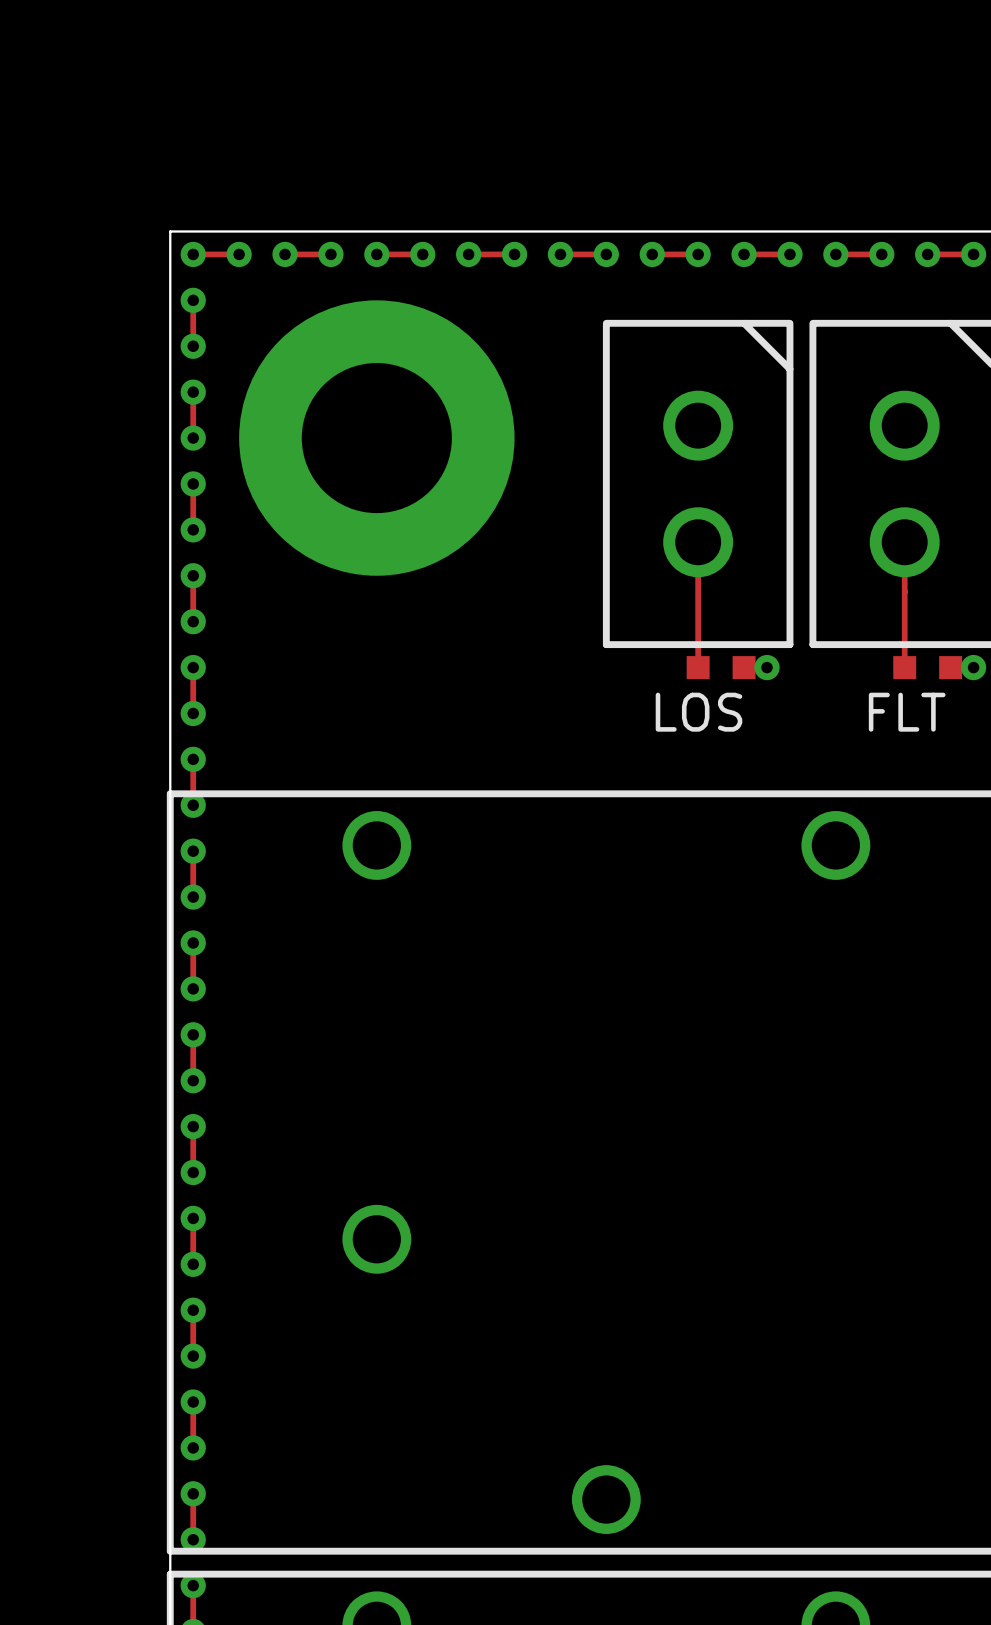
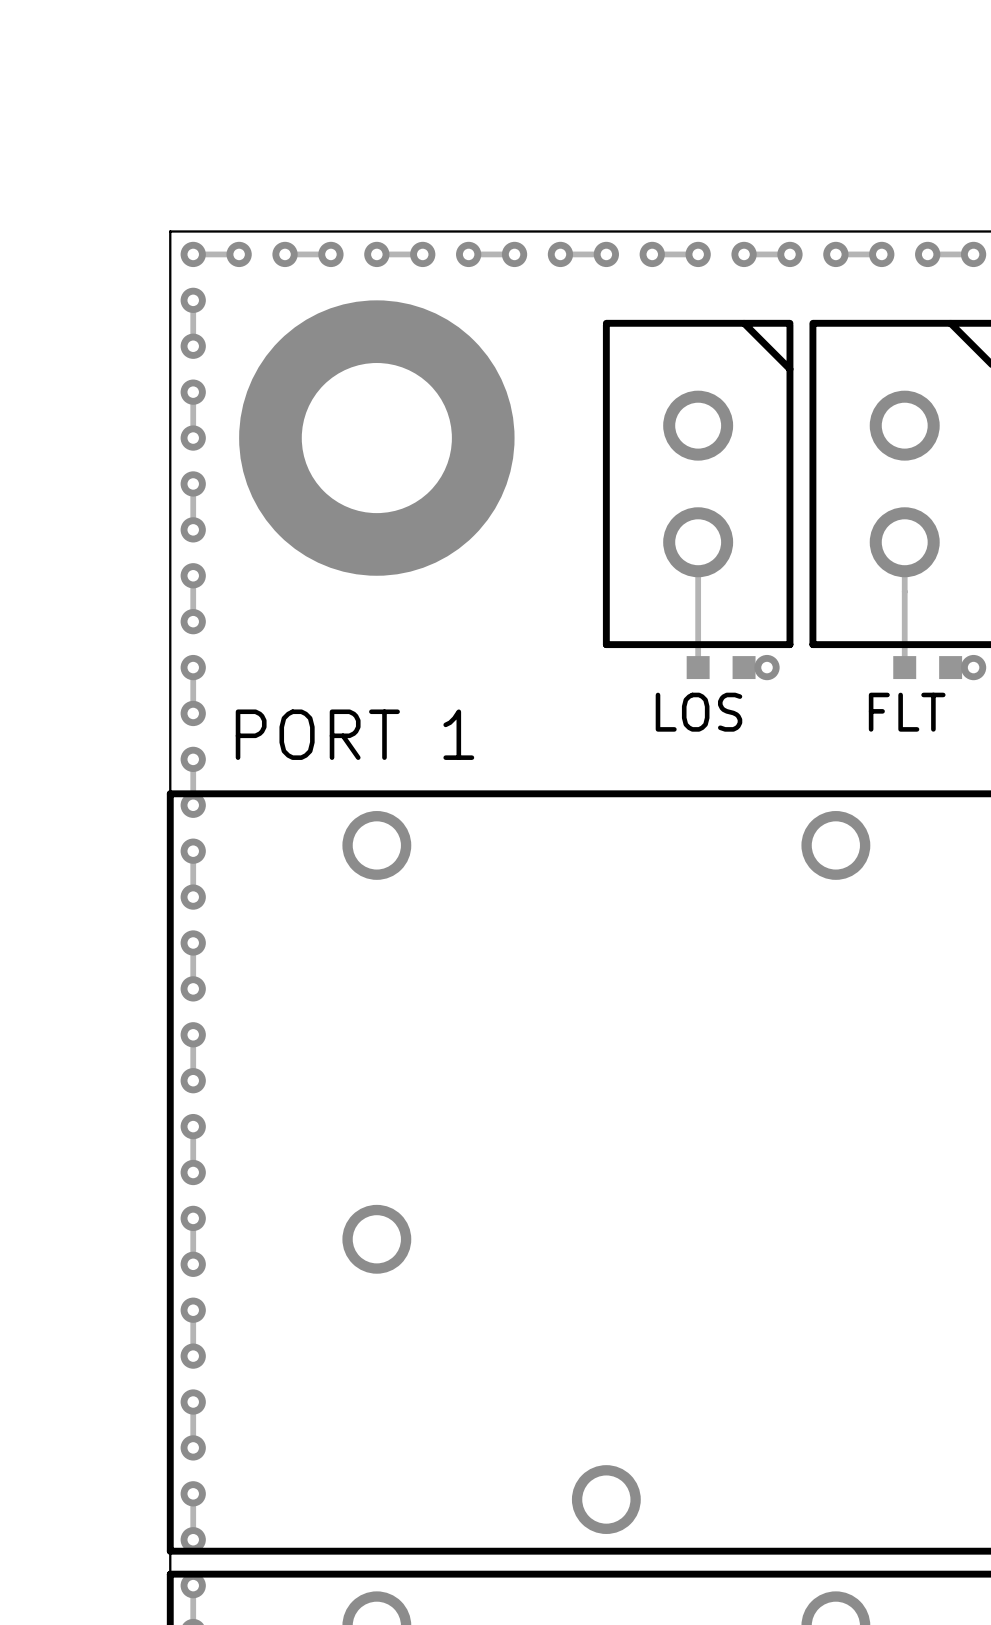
text: none -> PORT 1 (354, 734)

